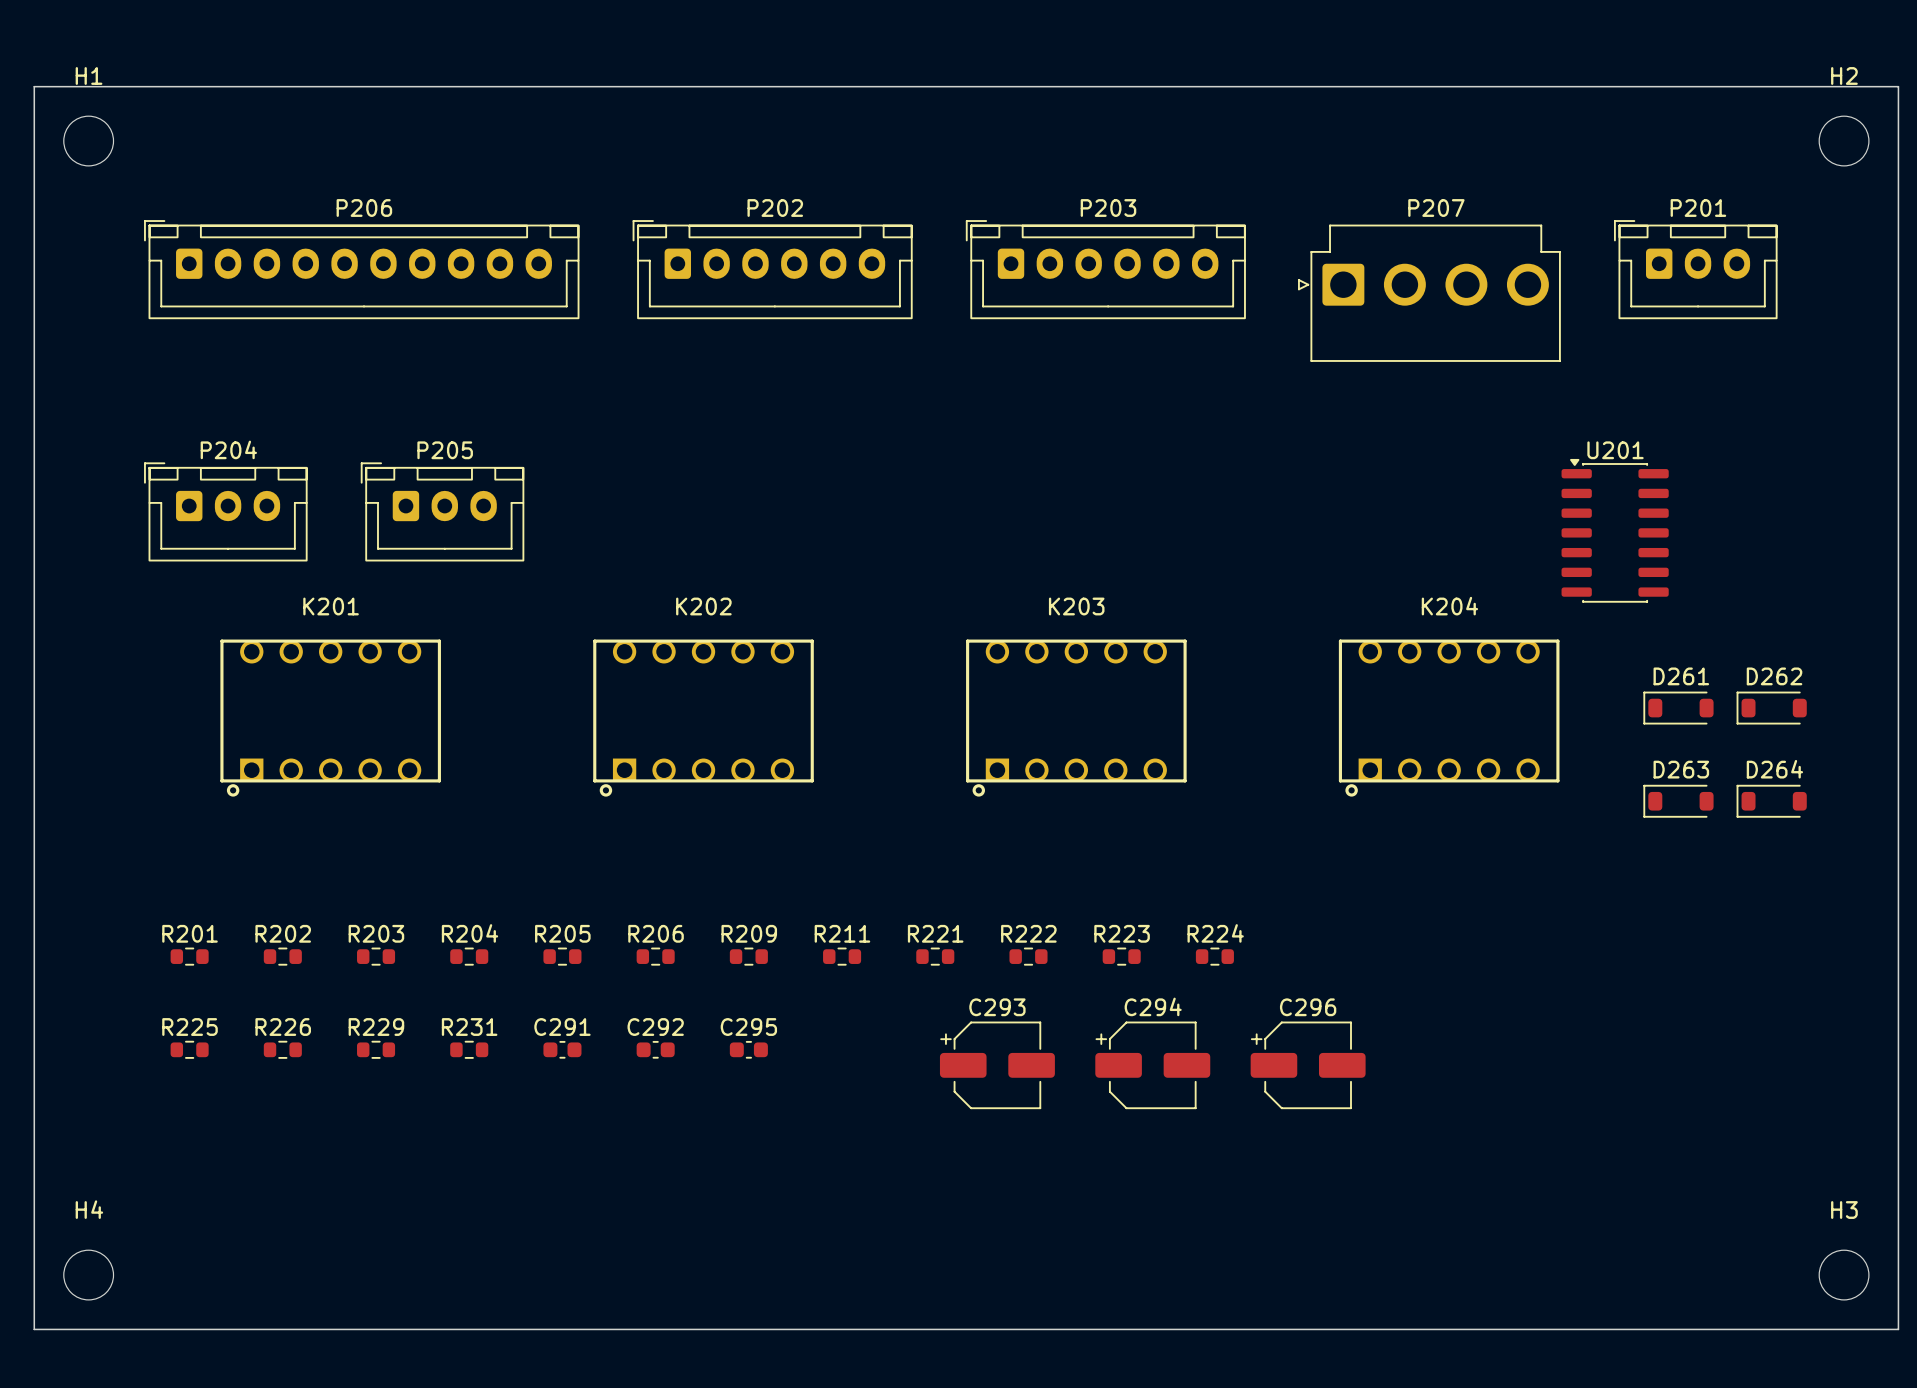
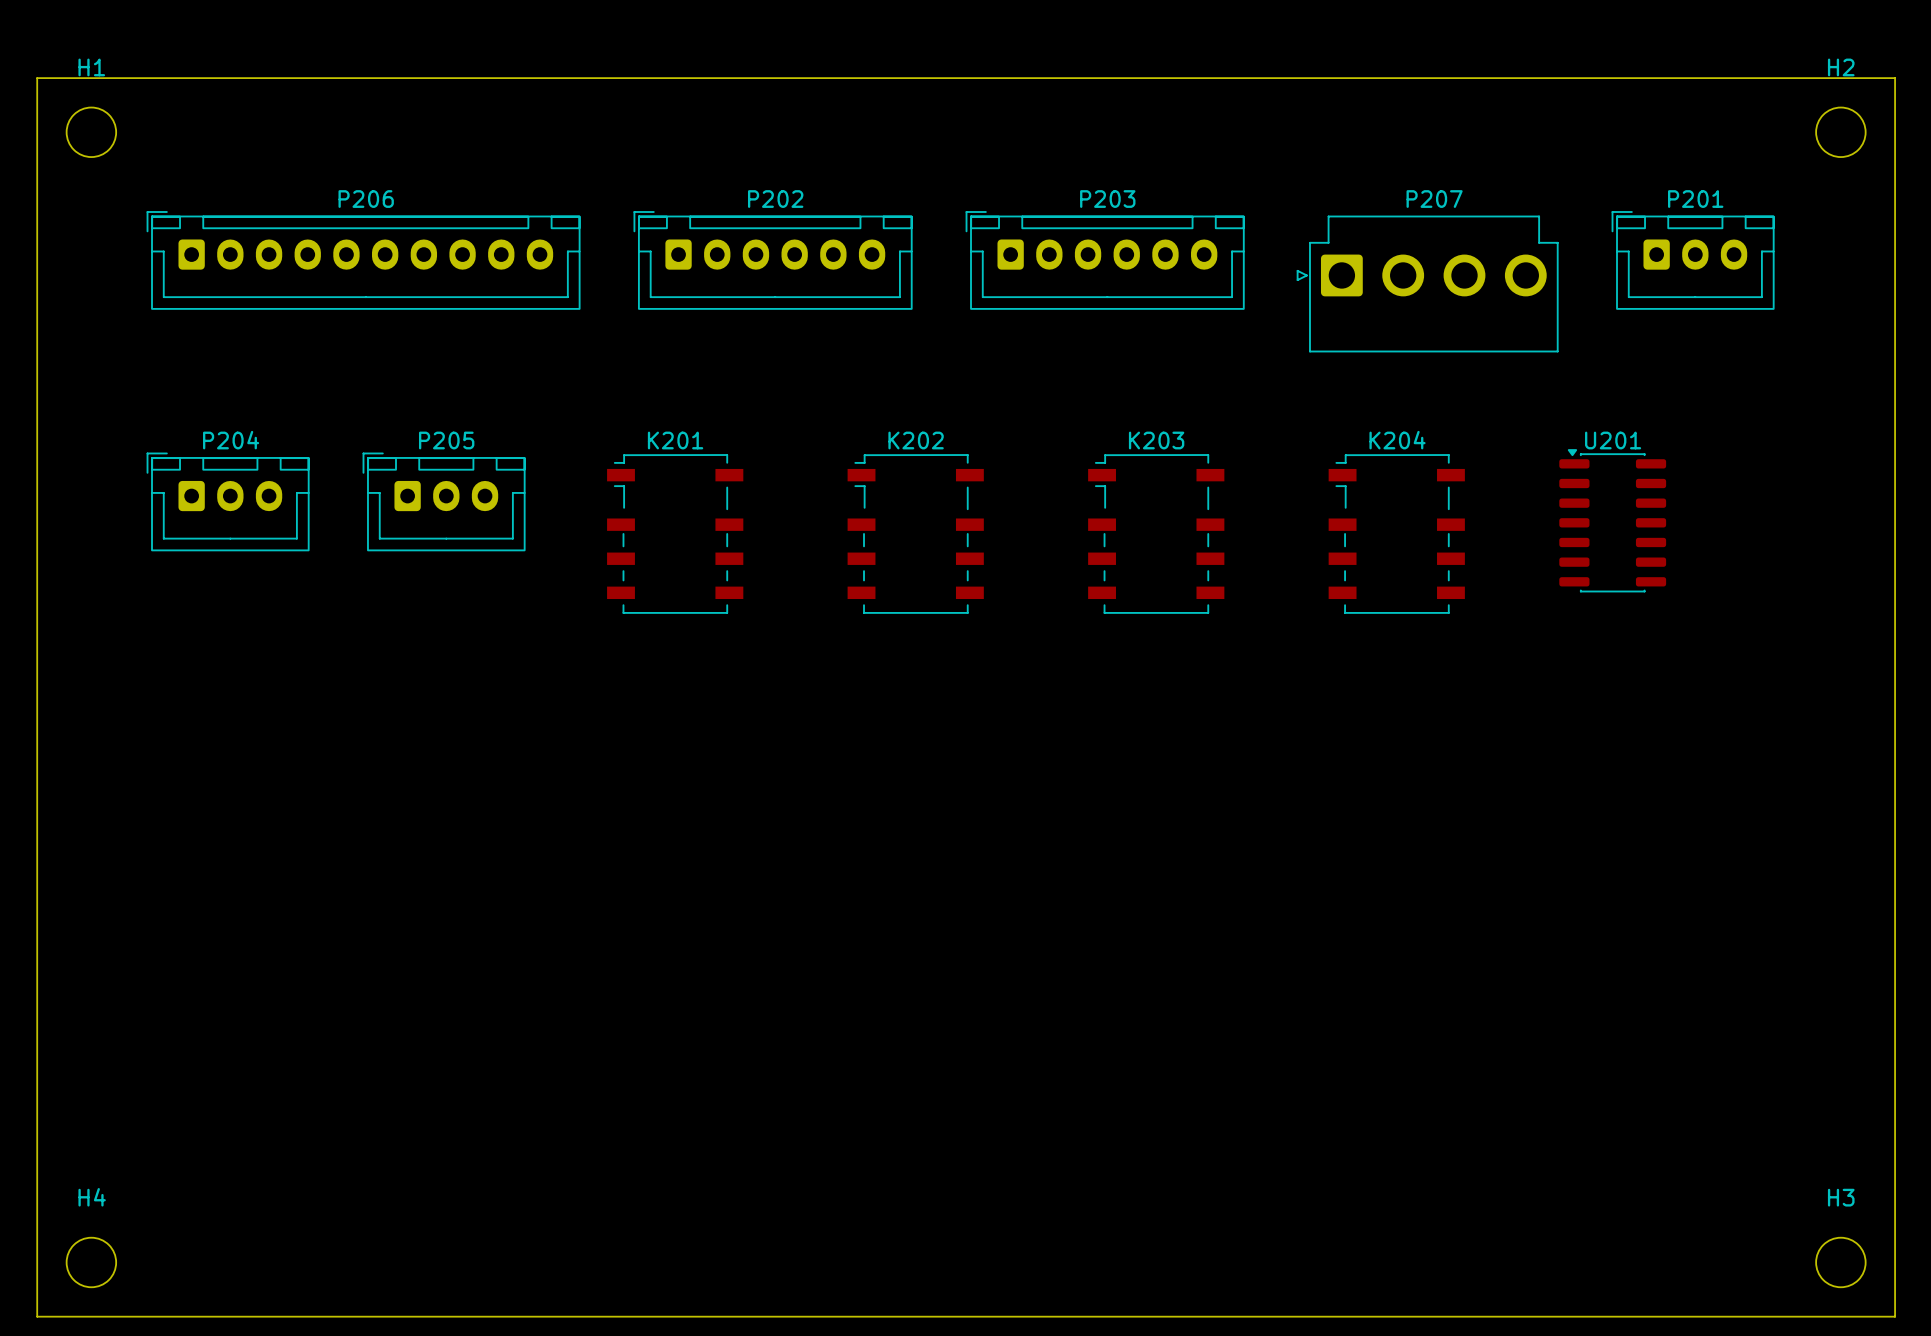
K201 footprint: [220, 639, 441, 797] -> [607, 454, 744, 614]
K202 footprint: [593, 639, 814, 797] -> [847, 454, 984, 614]
K203 footprint: [966, 639, 1187, 797] -> [1088, 454, 1225, 614]
K204 footprint: [1338, 639, 1560, 797] -> [1328, 454, 1465, 614]
D261: (1678, 708) -> none
D262: (1771, 708) -> none
D263: (1678, 801) -> none
D264: (1771, 801) -> none
R201: (189, 956) -> none
R202: (282, 956) -> none
R203: (376, 956) -> none
R204: (469, 956) -> none
R205: (562, 956) -> none
R206: (655, 956) -> none
R209: (748, 956) -> none
R211: (842, 956) -> none
R221: (935, 956) -> none
R222: (1028, 956) -> none
R223: (1121, 956) -> none
R224: (1214, 956) -> none
R225: (189, 1049) -> none
R226: (282, 1049) -> none
R229: (376, 1049) -> none
R231: (469, 1049) -> none
C291: (562, 1049) -> none
C292: (655, 1049) -> none
C295: (748, 1049) -> none
C293: (997, 1065) -> none
C294: (1152, 1065) -> none
C296: (1308, 1065) -> none

